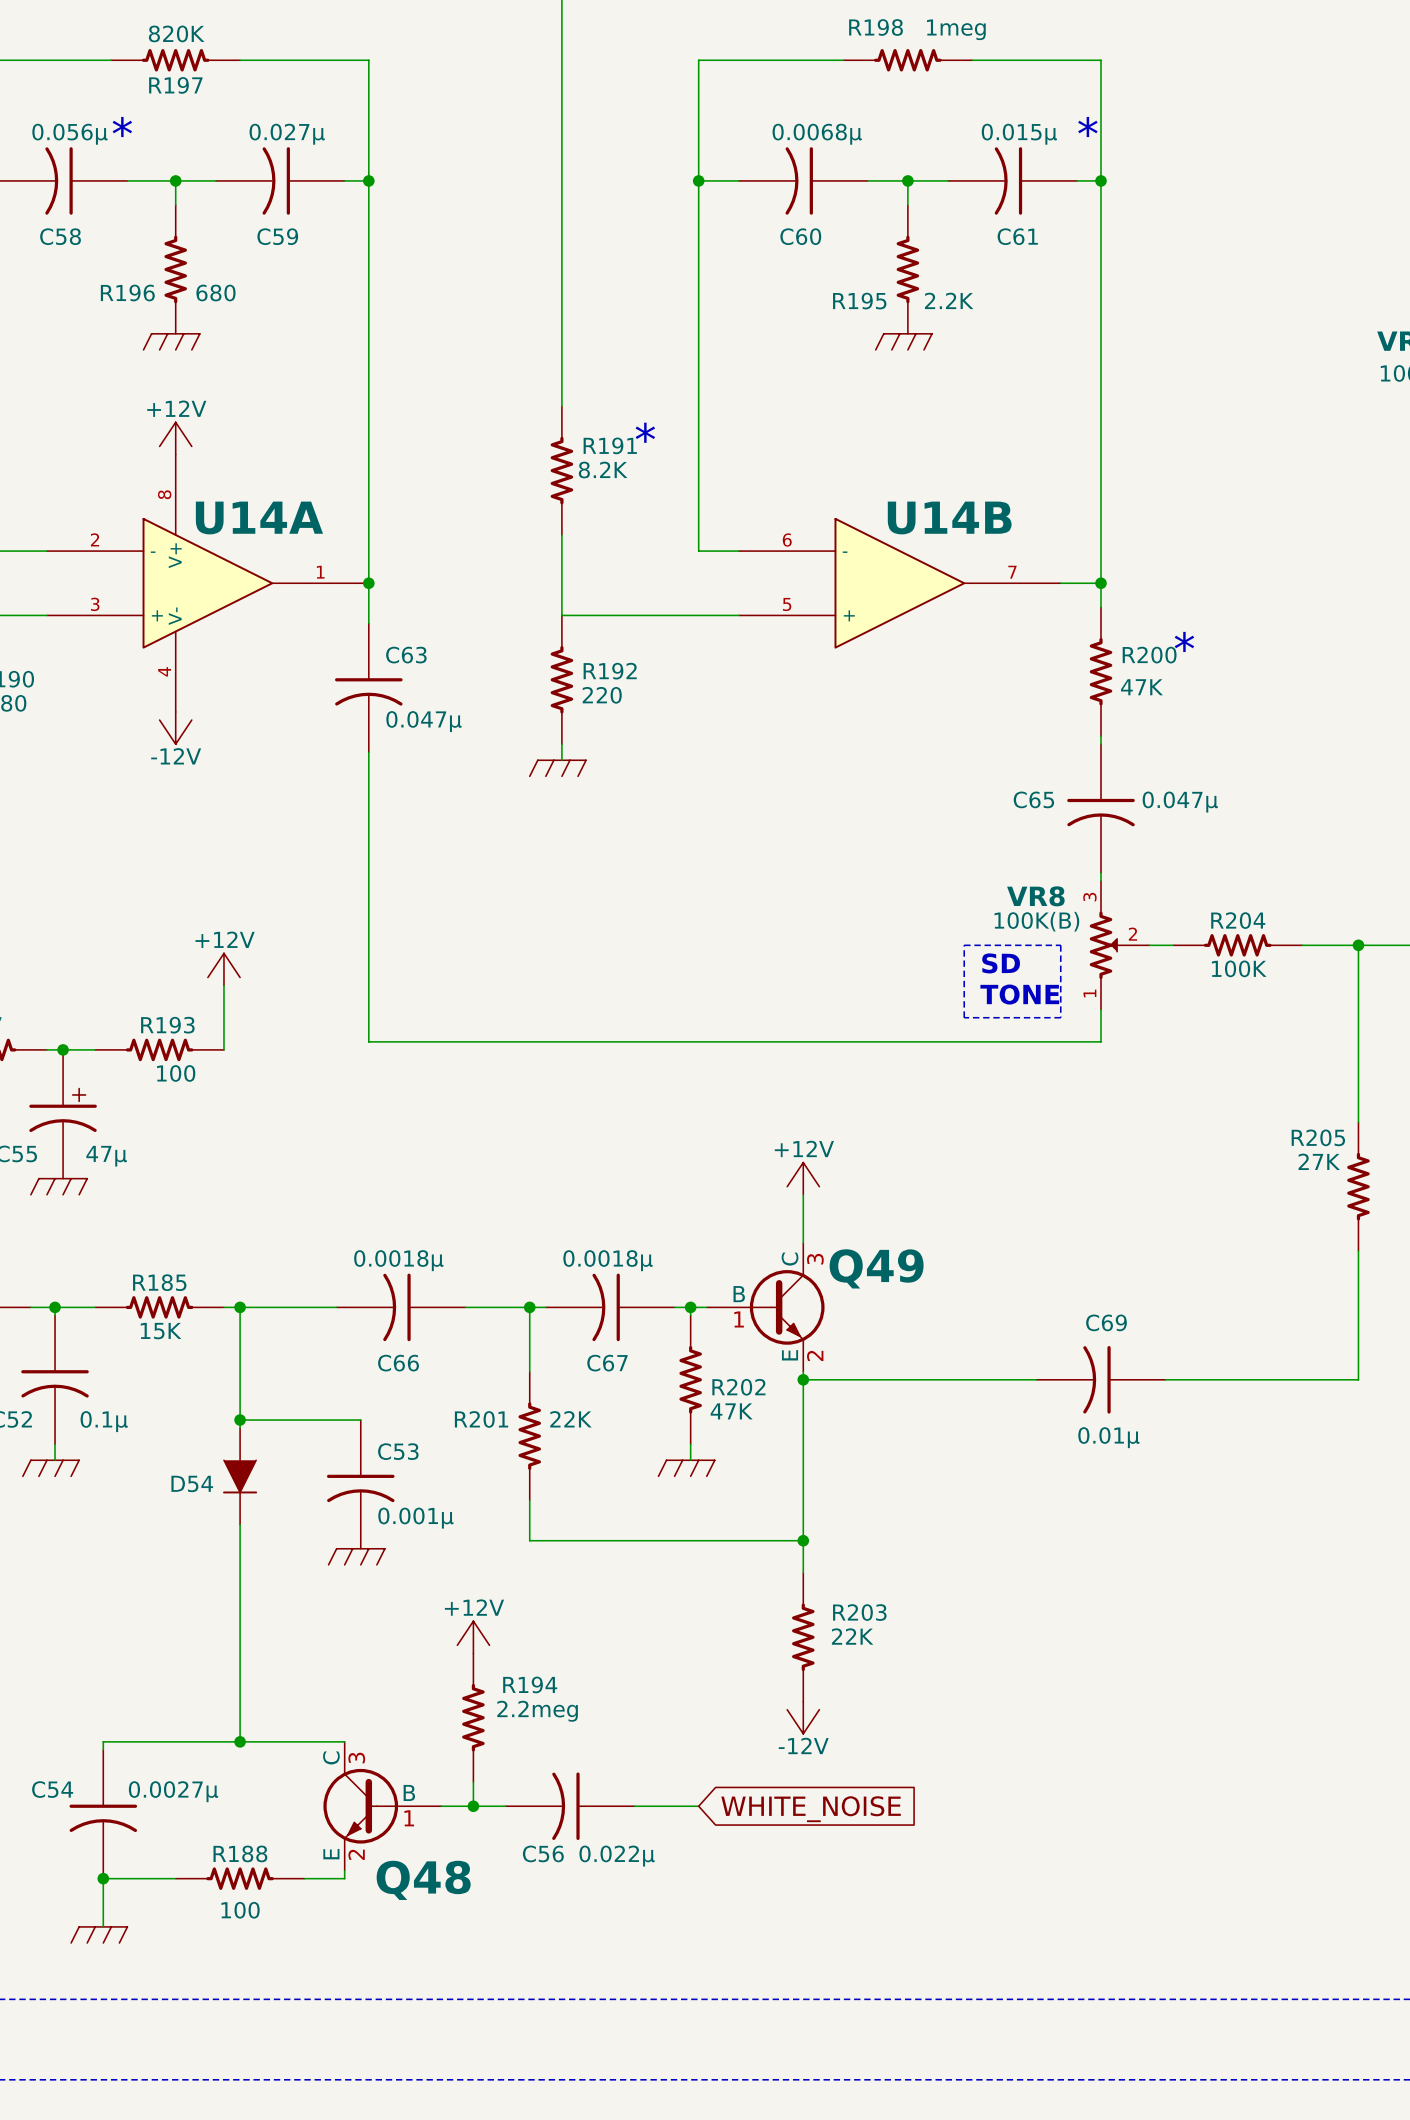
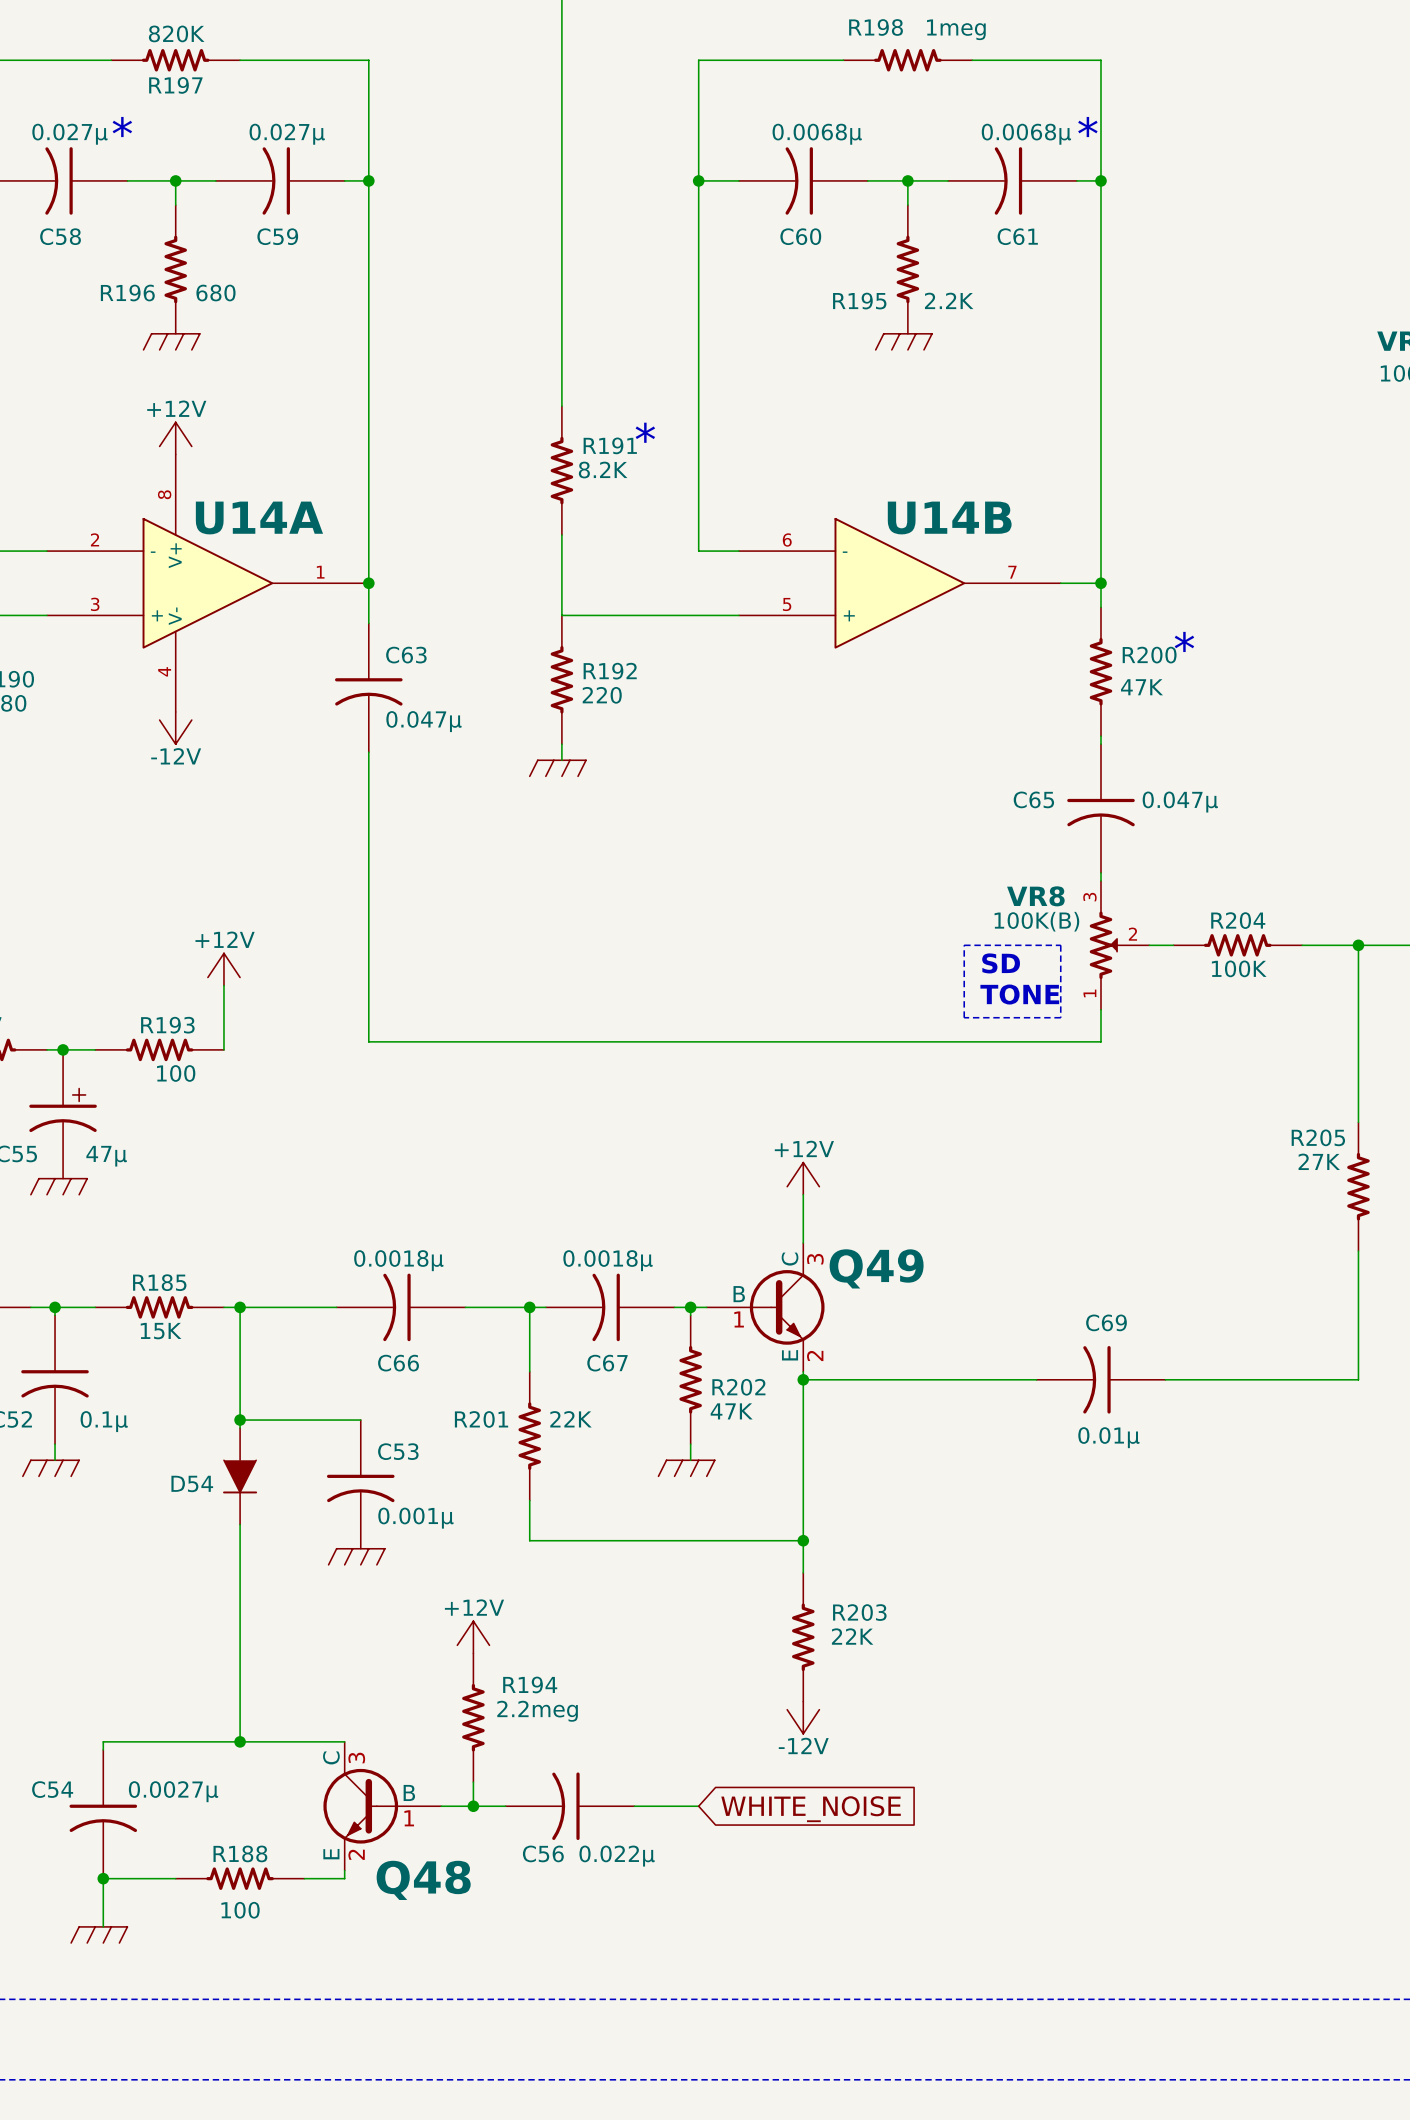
C58 value: 0.056μ (69, 134) -> 0.027μ (69, 134)
C61 value: 0.015μ (1019, 134) -> 0.0068μ (1026, 134)

